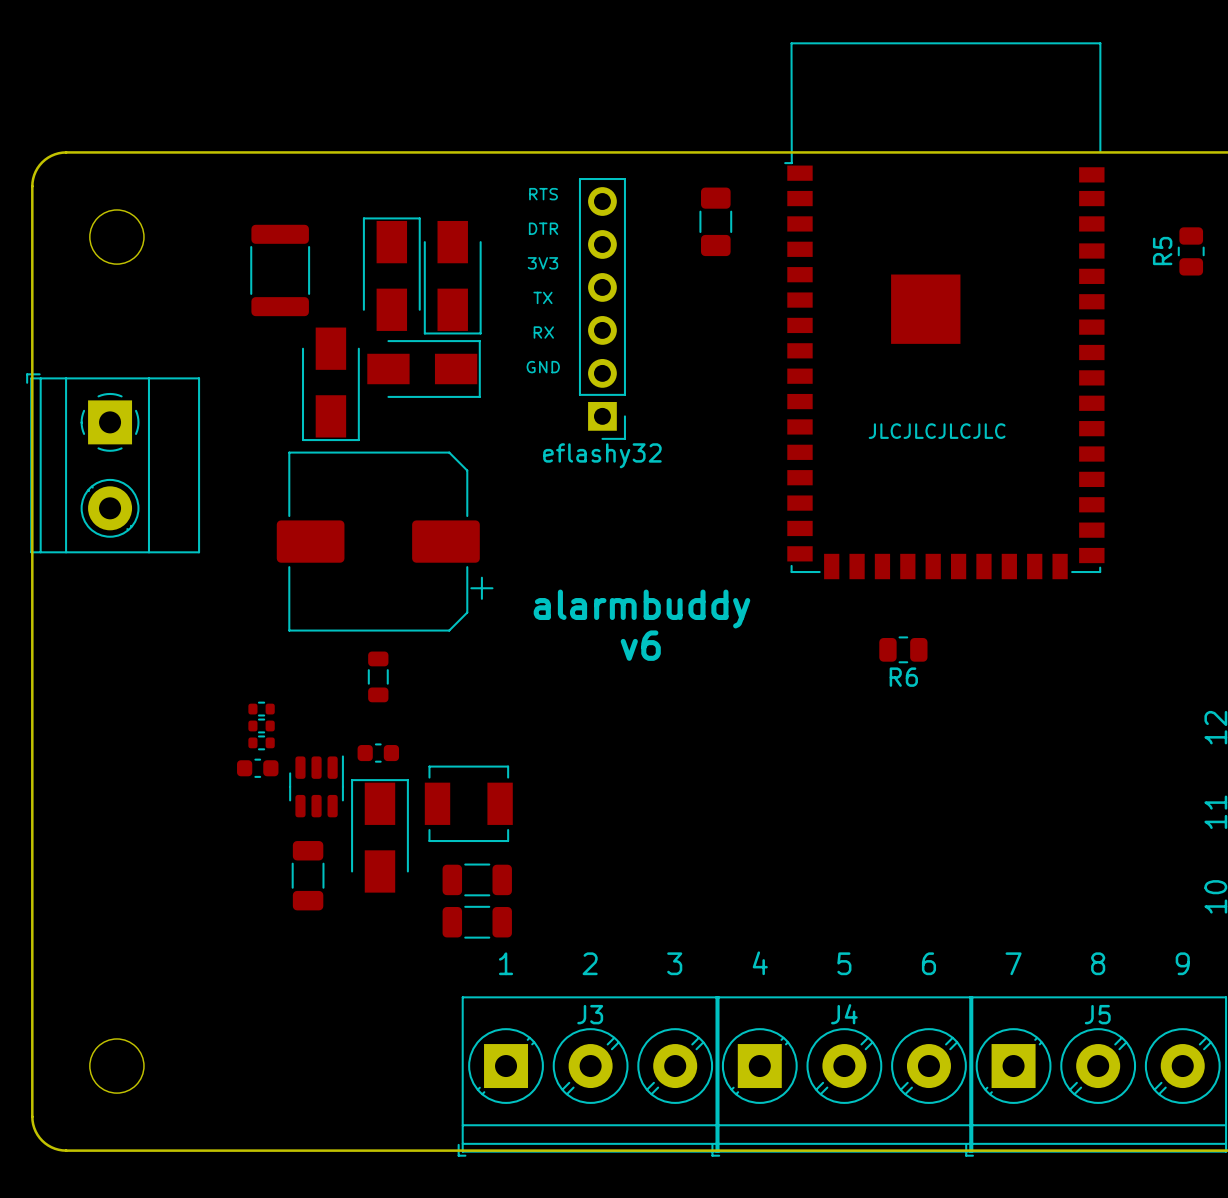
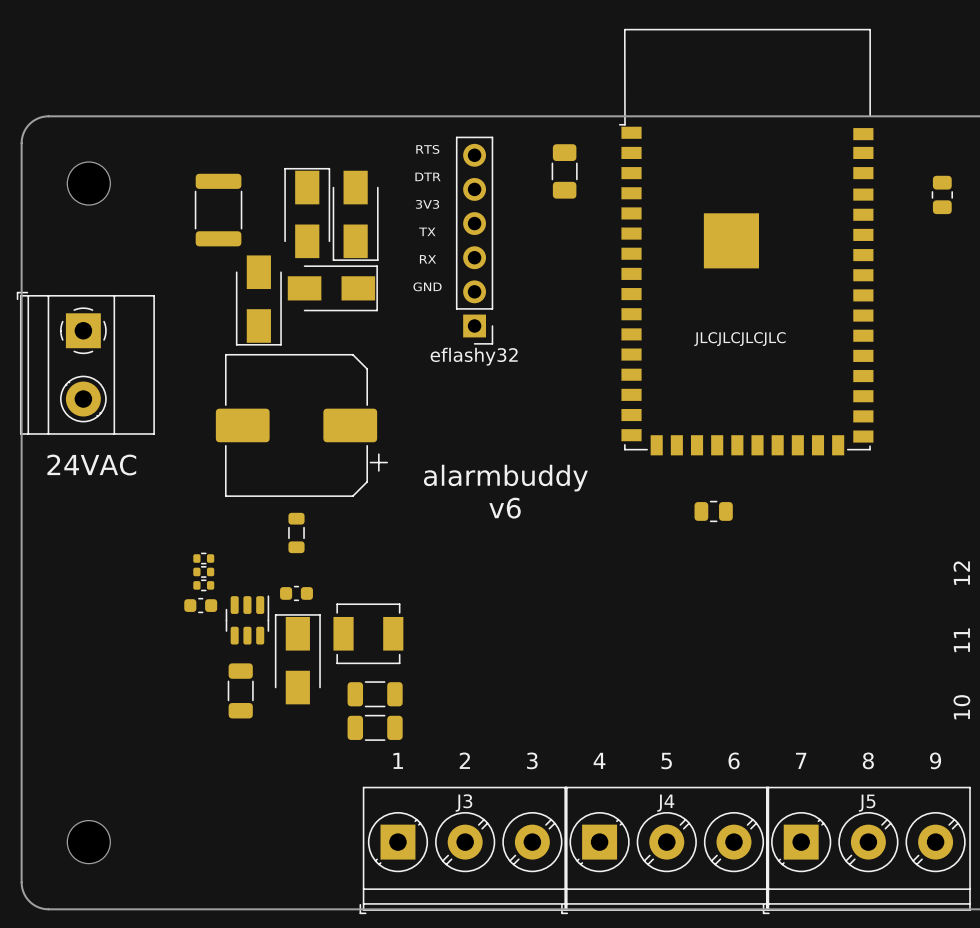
R5 name: R5 (1162, 251) -> none
text: none -> 24VAC (91, 465)
R6 name: R6 (903, 677) -> none

